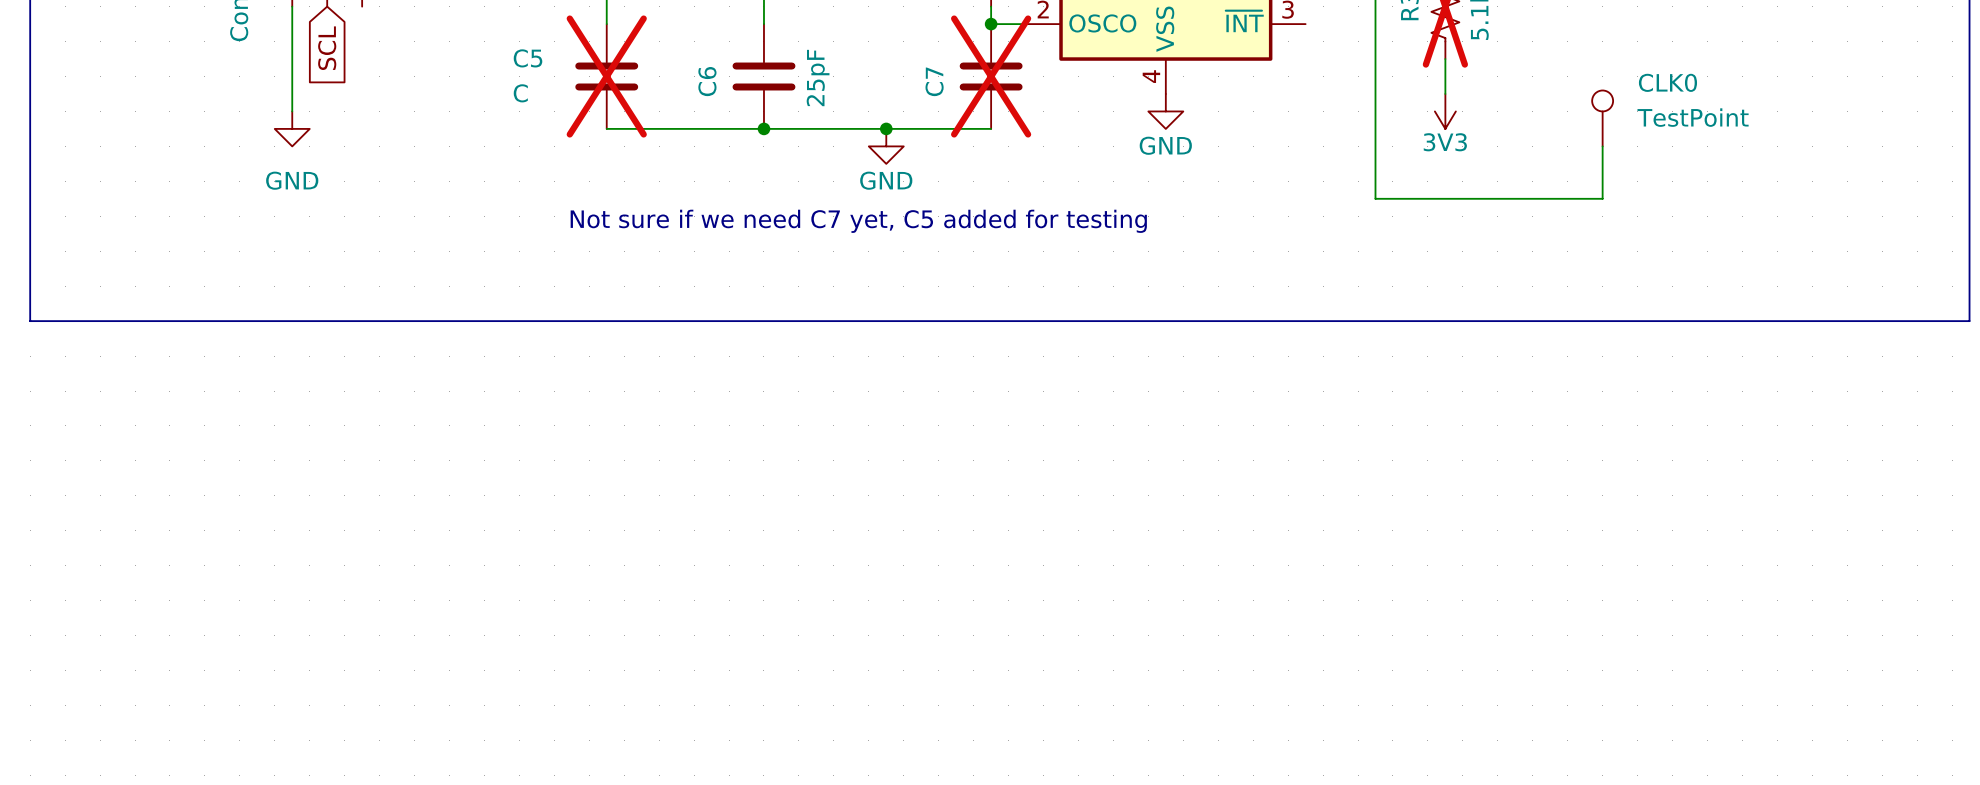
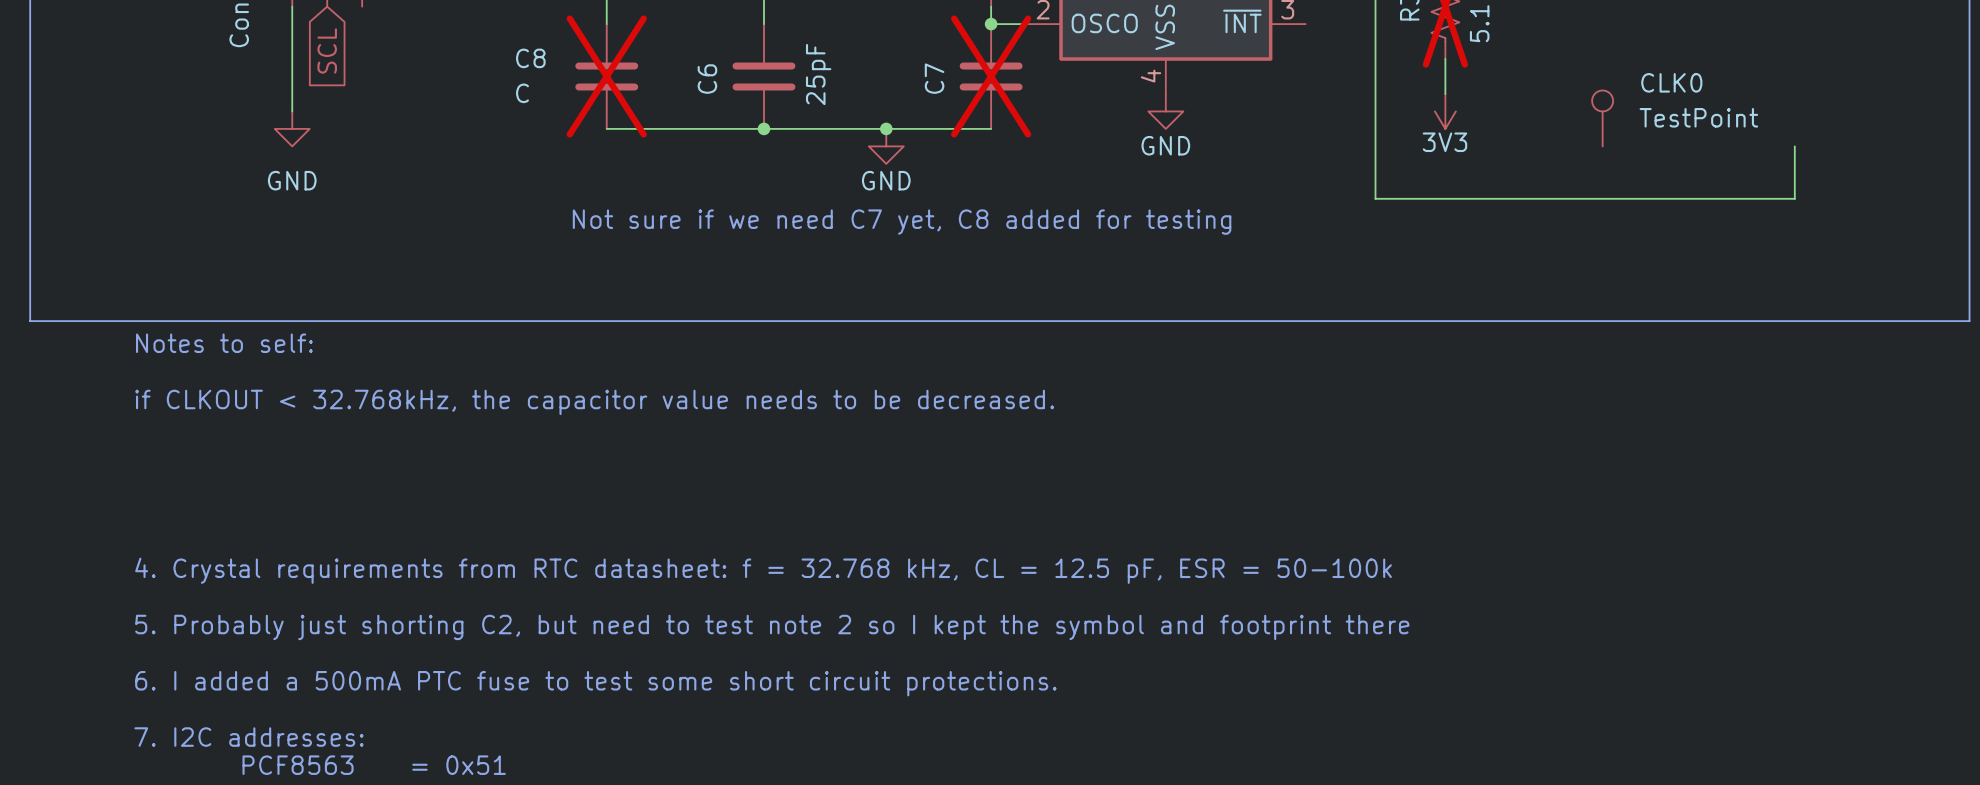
C5 name: C5 (528, 58) -> C8 (530, 58)
wire: (1602, 146) (1602, 198) -> (1794, 146) (1794, 198) (1602, 198)
text: Not sure if we need C7 yet, C5 added for testing (858, 221) -> Not sure if we need C7 yet, C8 added for testing (902, 222)
text: none -> Notes to self: (224, 343)
text: none -> if CLKOUT < 32.768kHz, the capacitor value needs to be decreased. (594, 402)
text: none -> 4. Crystal requirements from RTC datasheet: f = 32.768 kHz, CL = 12.5 pF, ESR = 50-100k (763, 570)
text: none -> 5. Probably just shorting C2, but need to test note 2 so I kept the symbol and footprint there (772, 627)
text: none -> 6. I added a 500mA PTC fuse to test some short circuit protections. (595, 683)
text: none -> 7. I2C addresses: (248, 737)
text: none -> PCF8563 = 0x51 (374, 765)

